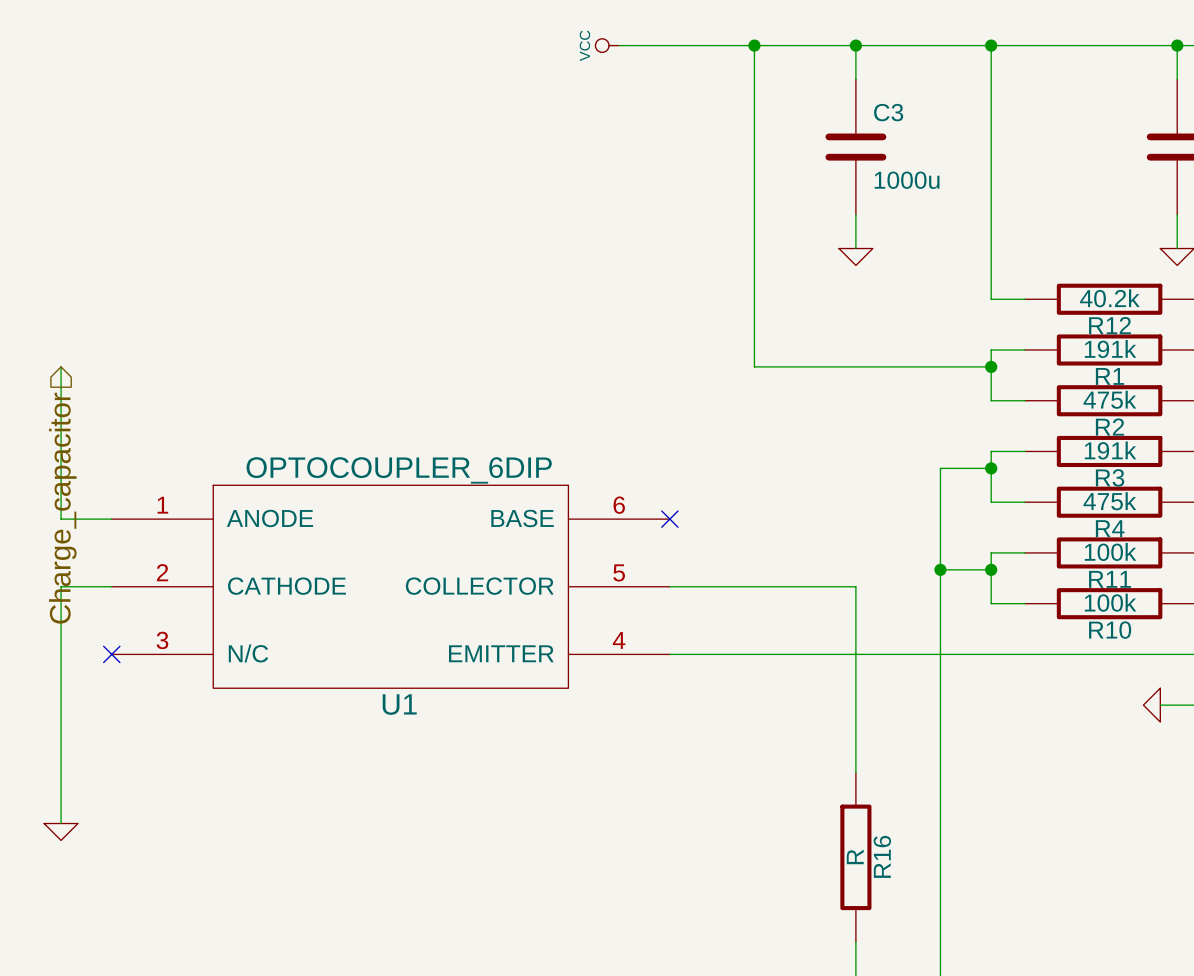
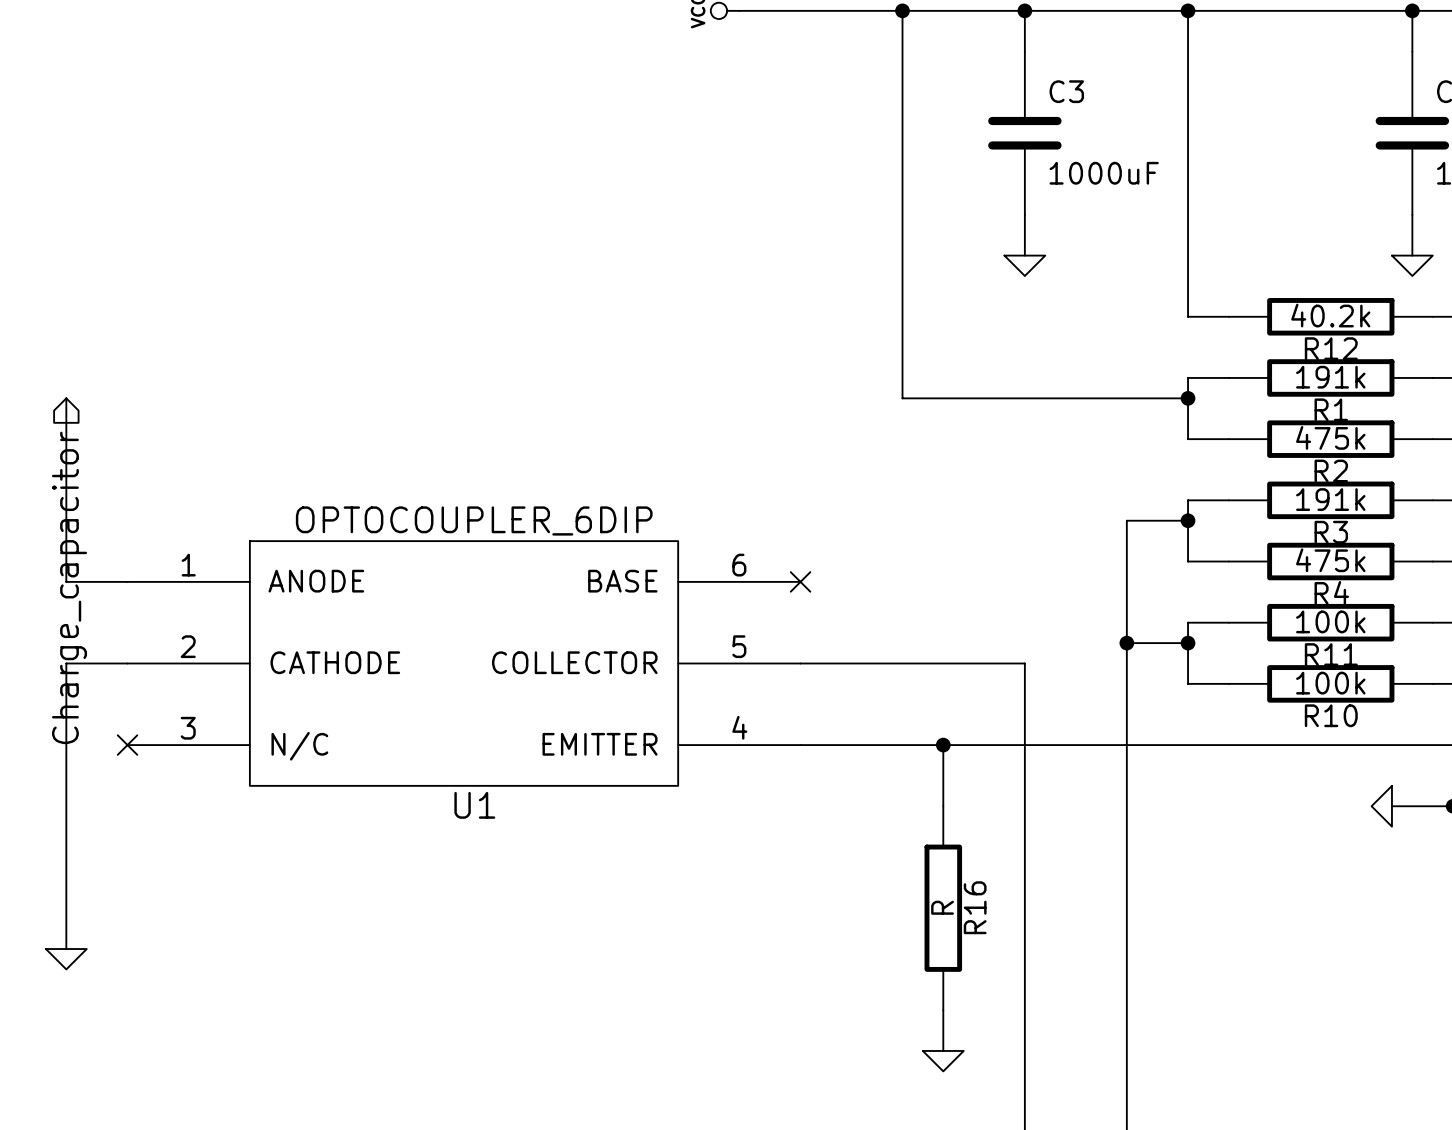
C3 value: 1000u (907, 180) -> 1000uF (1104, 173)
wire: none -> (943, 745) (943, 806)
junction: none -> (943, 745)
wire: none -> (1024, 887) (1024, 1091)
R16 position: (855, 857) -> (943, 908)
wire: none -> (943, 1010) (943, 1050)
power symbol: none -> (943, 1061)

